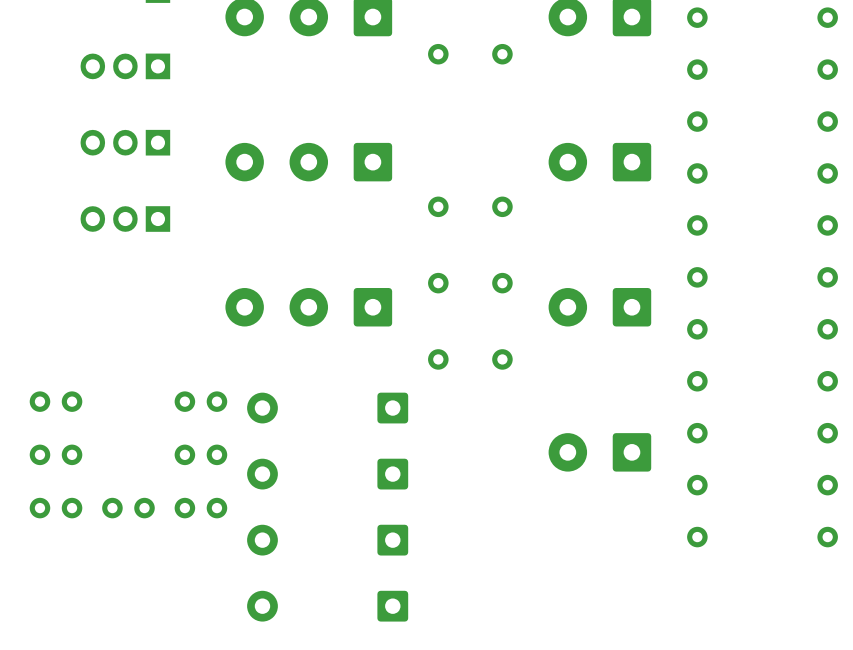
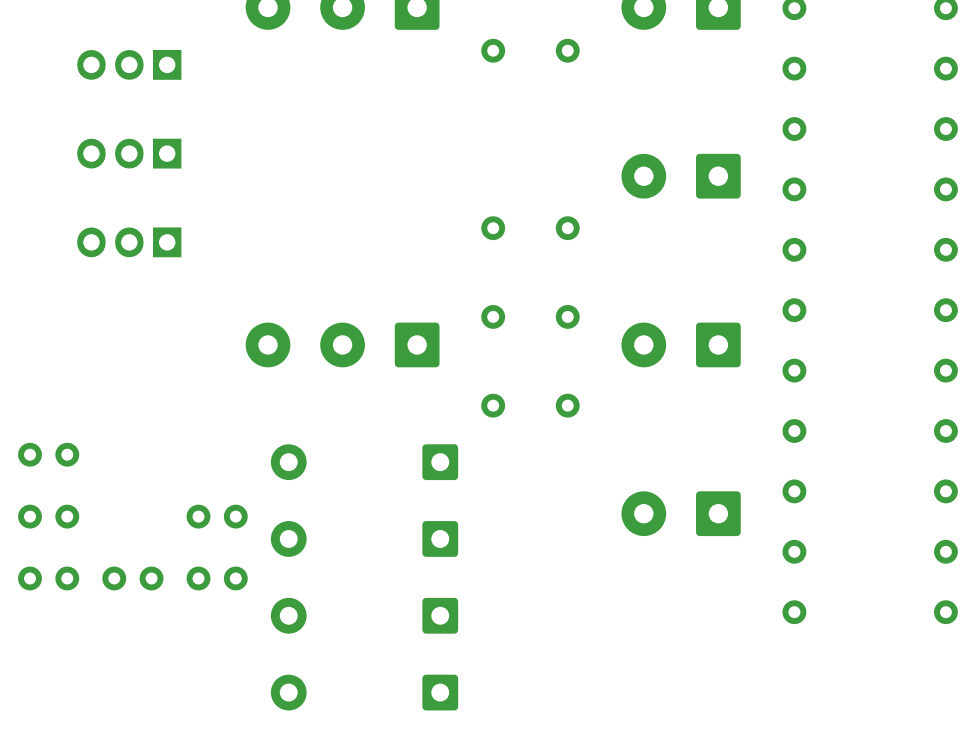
part: (308, 162) -> none
part: (200, 401) -> none

